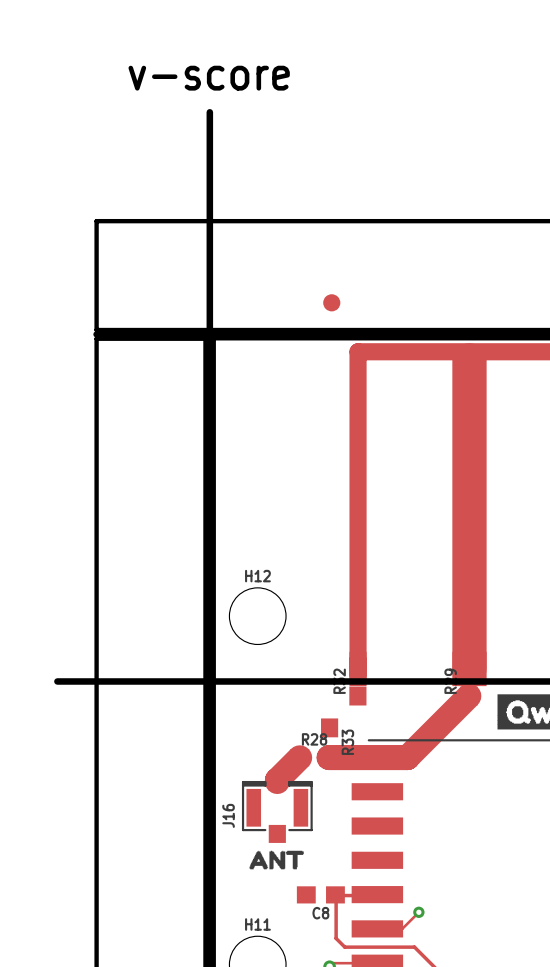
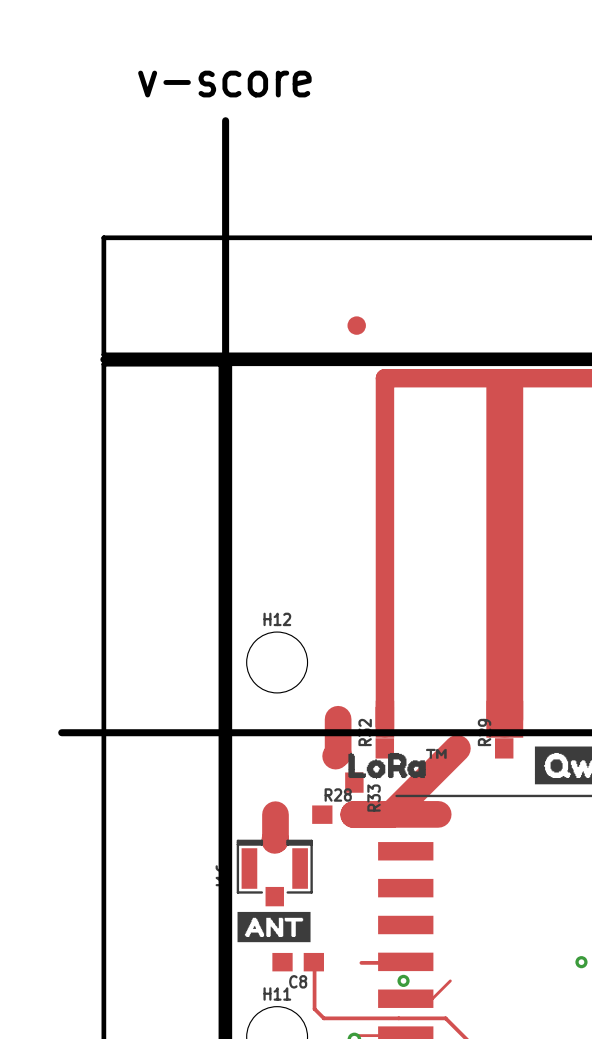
track: none -> (338, 719) (338, 753) (335, 756)
drawing: none -> [348, 748, 447, 779]
track: (468, 696) (407, 757) (363, 757) -> (457, 748) (391, 814)
track: none -> (275, 814) (274, 840)
track: (299, 757) (277, 781) -> none
J16 position: (277, 807) -> (274, 868)
drawing: none -> [237, 911, 311, 943]
drawing: [249, 850, 304, 870] -> none
C8 position: (320, 894) -> (298, 962)
track: (335, 894) (336, 938) (344, 947) -> (313, 962) (314, 1008) (323, 1018) (370, 1018)
via: none -> (581, 962)
via position: (418, 912) -> (403, 980)

